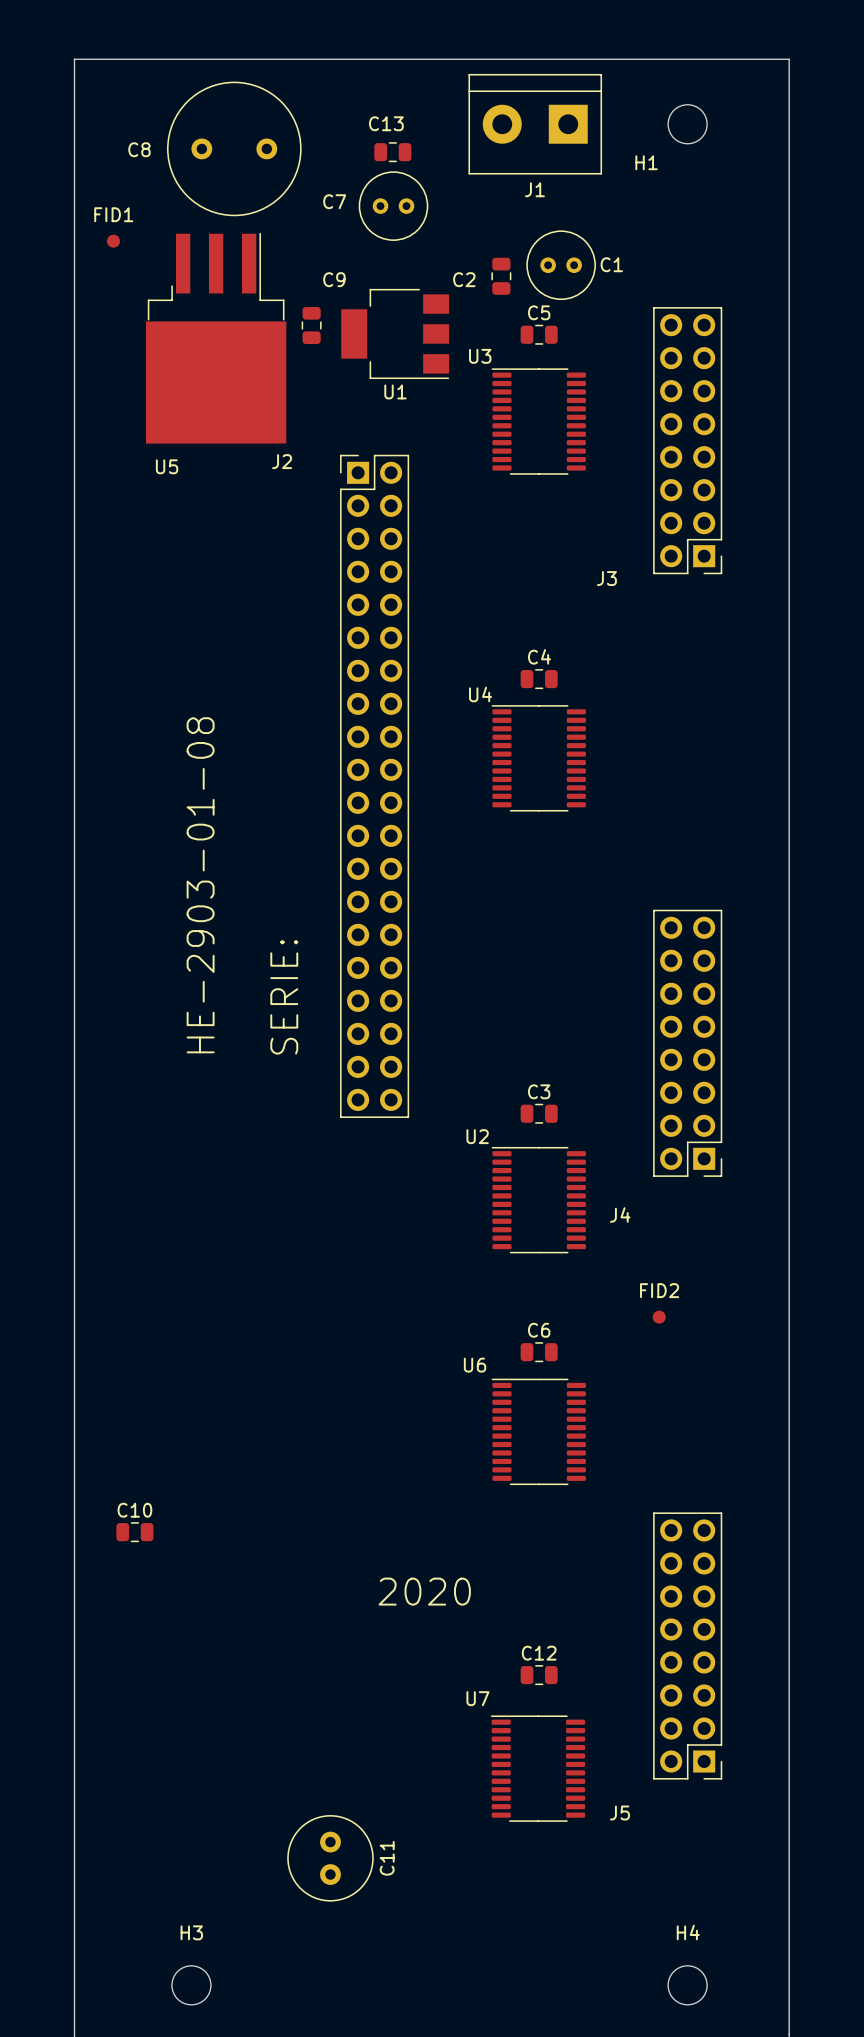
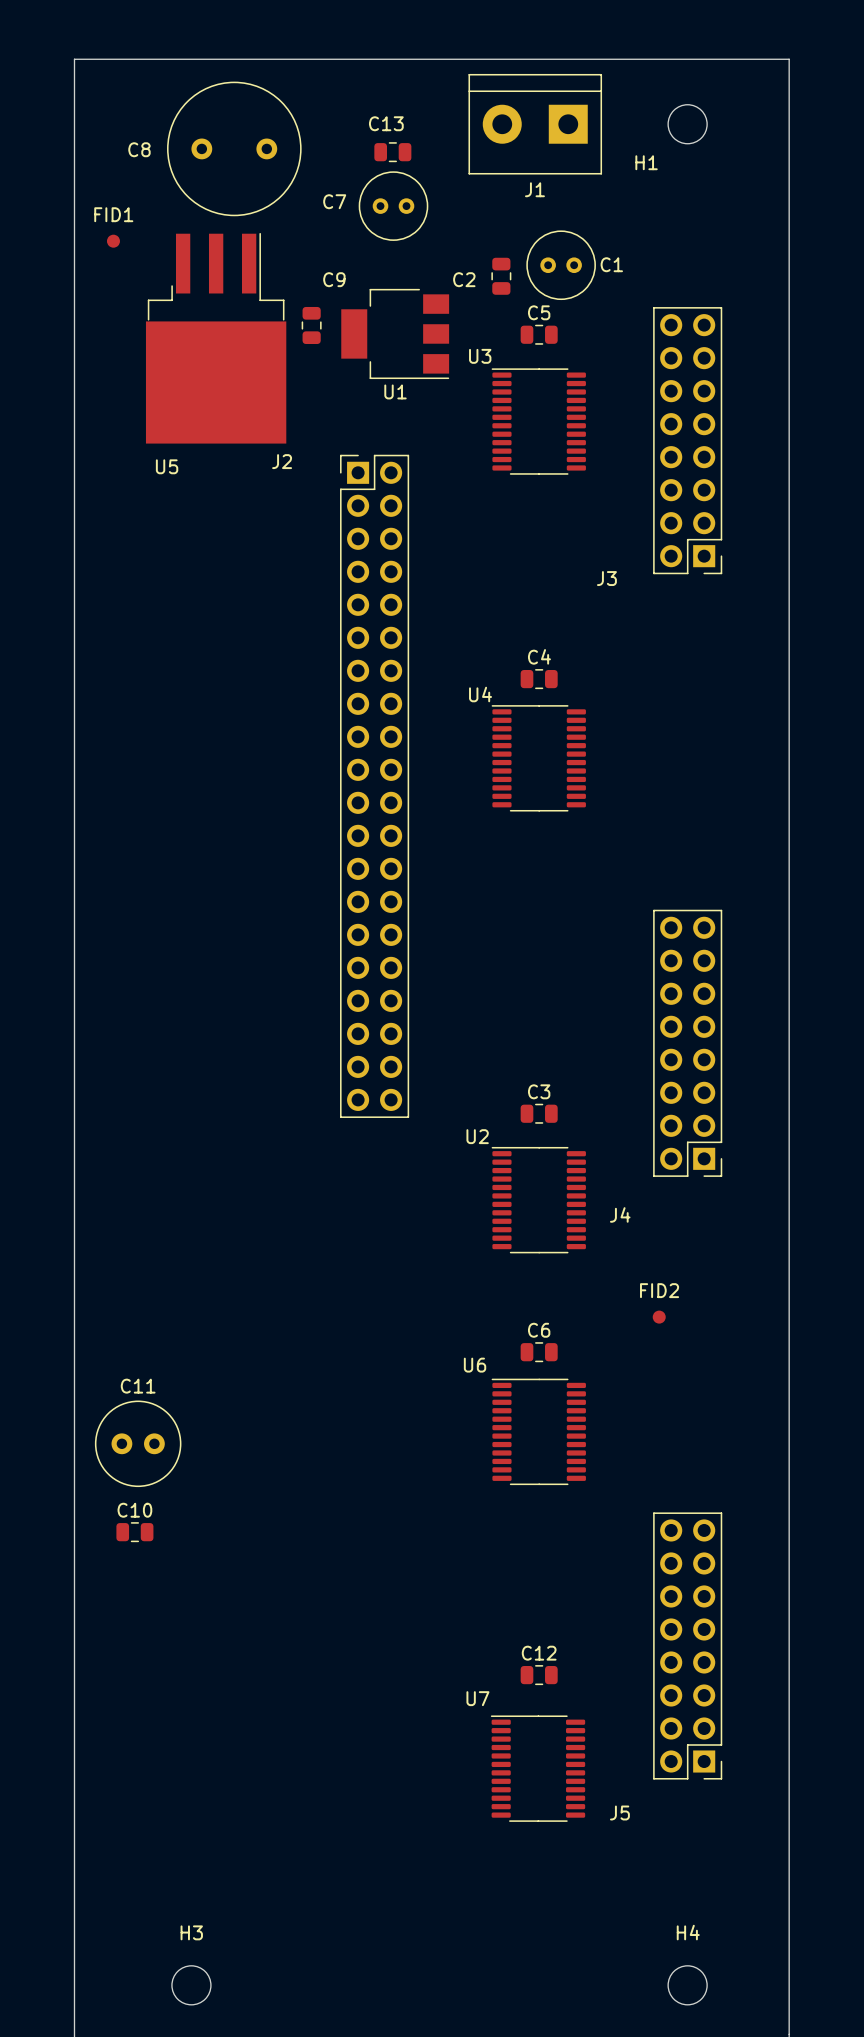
text: HE-2903-01-08 (200, 885) -> none
text: SERIE: (284, 997) -> none
text: 2020 (424, 1591) -> none
C11 rotation: 0° (330, 1858) -> 90° clockwise (138, 1443)
C11 position: (330, 1858) -> (138, 1443)
C11 name position: C11 (387, 1858) -> C11 (138, 1386)

